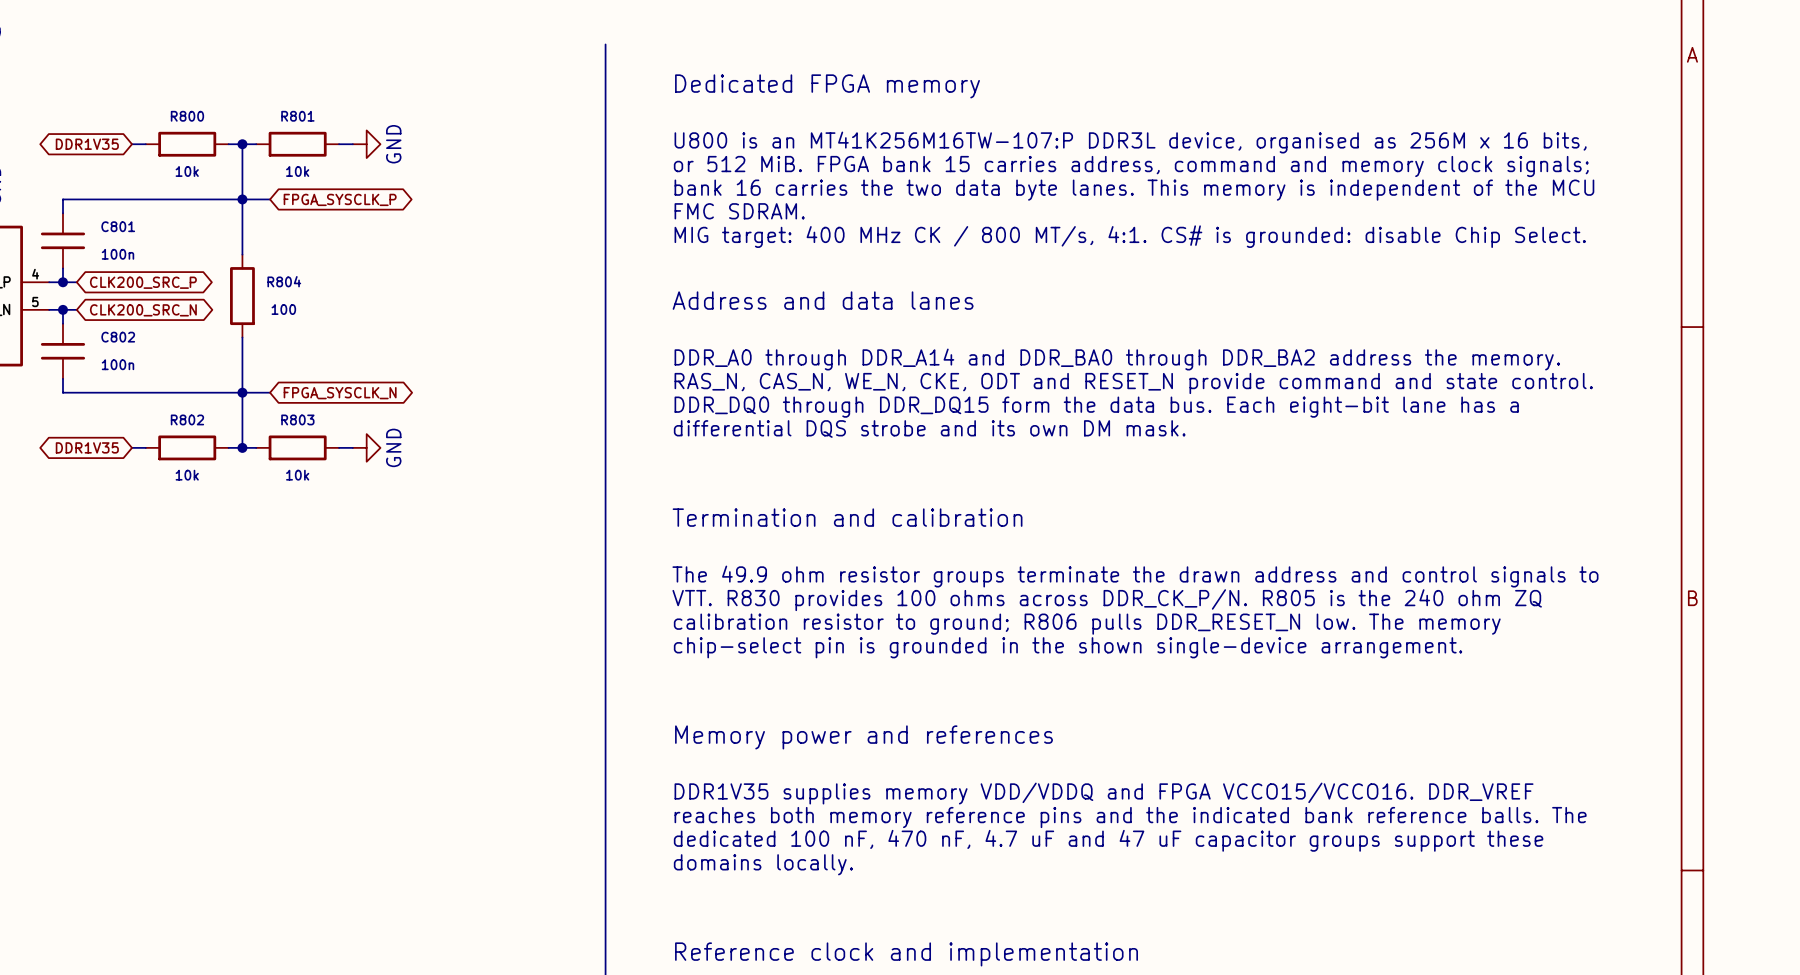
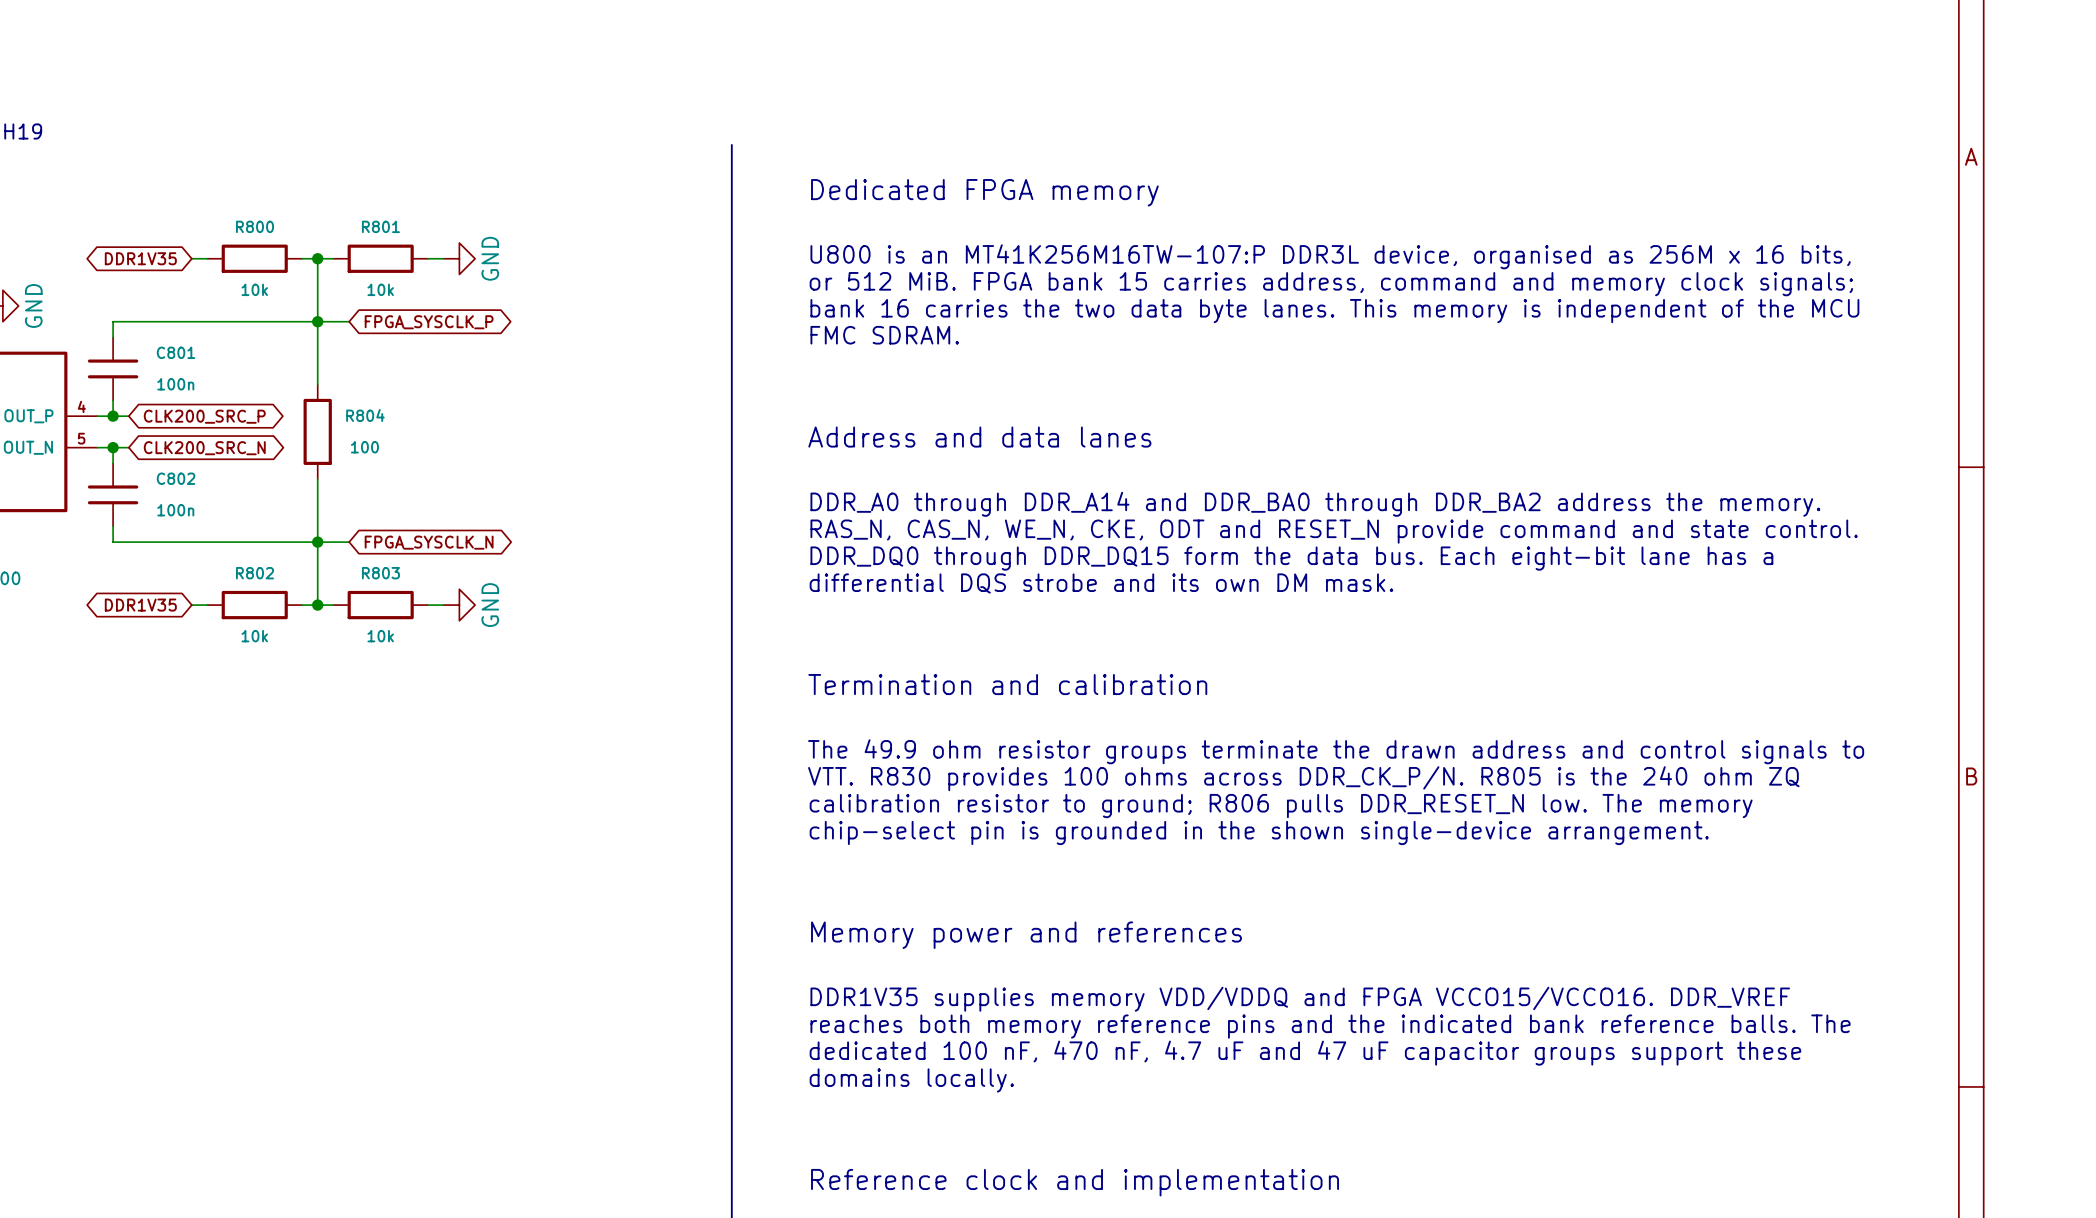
text: MIG target: 400 MHz CK / 800 MT/s, 4:1. CS# is grounded: disable Chip Select. (1130, 236) -> none

